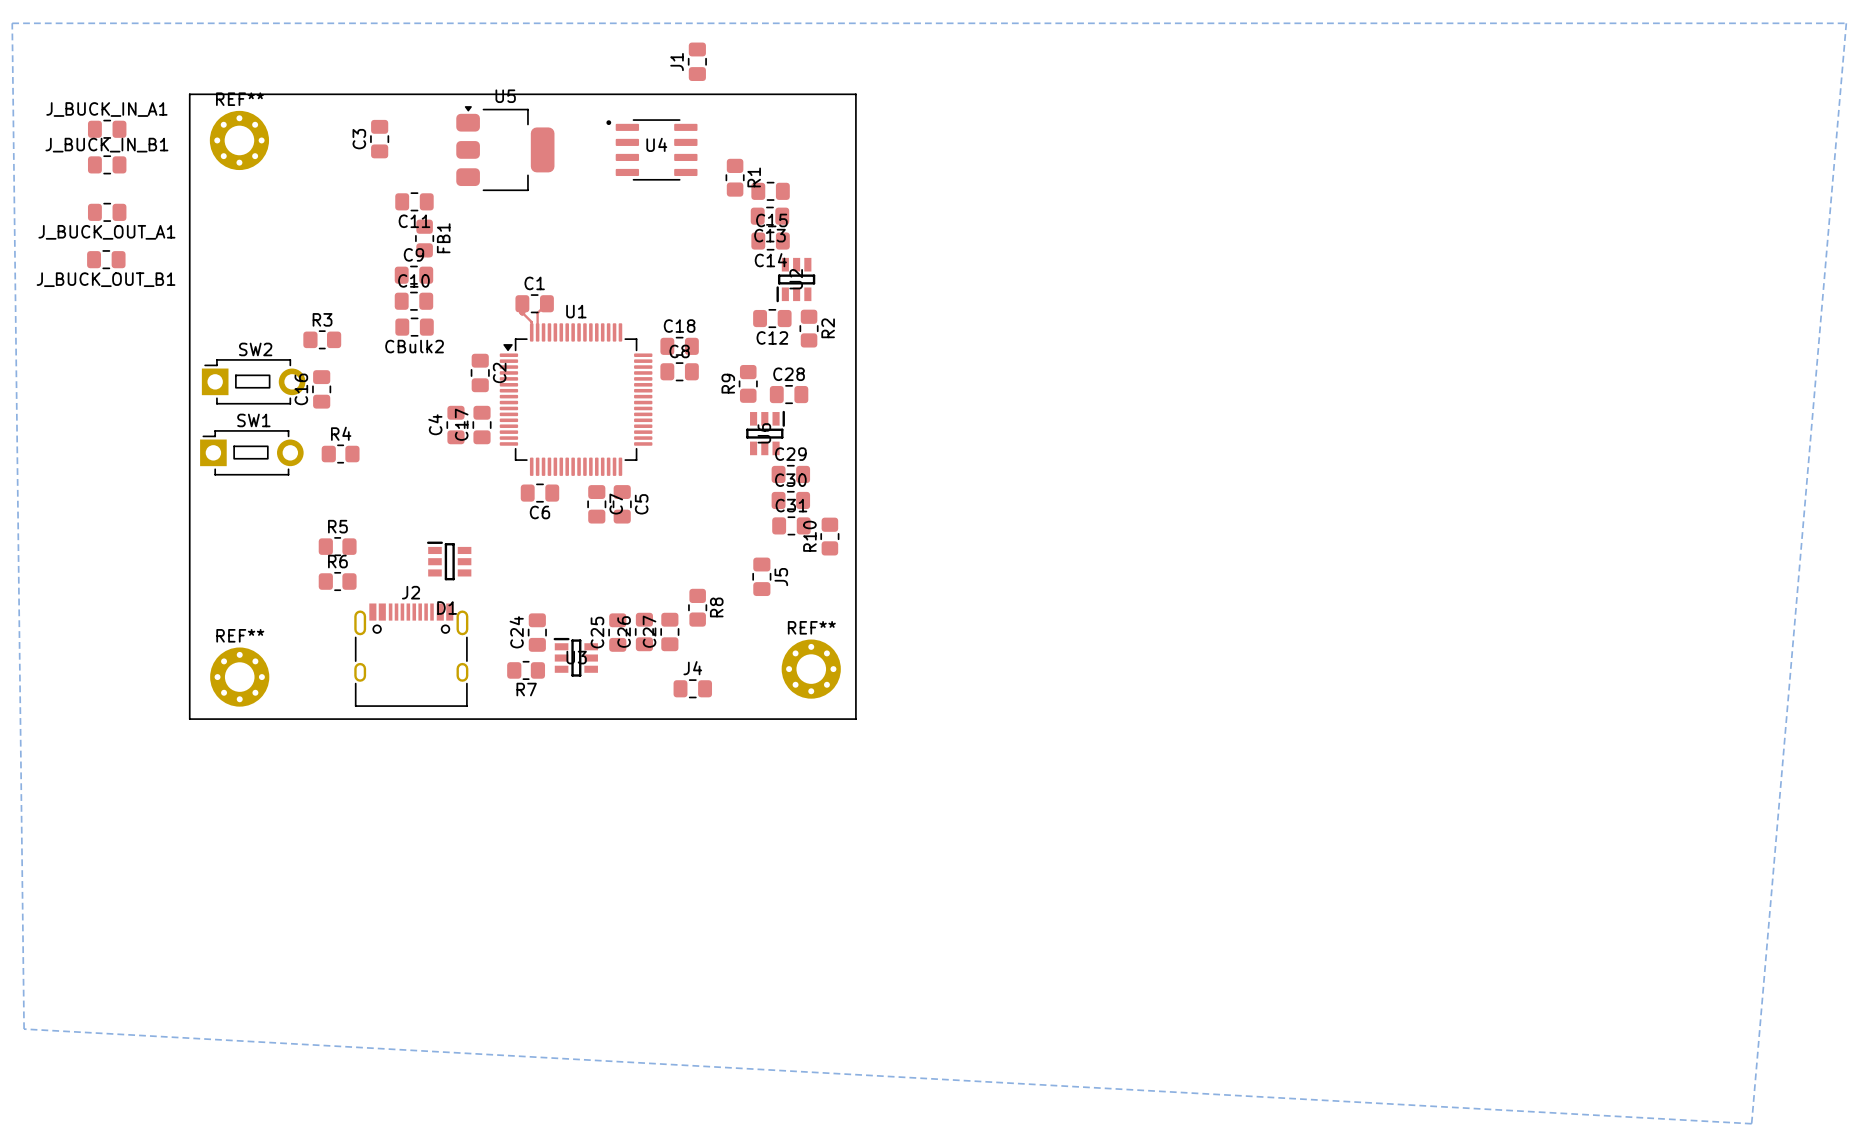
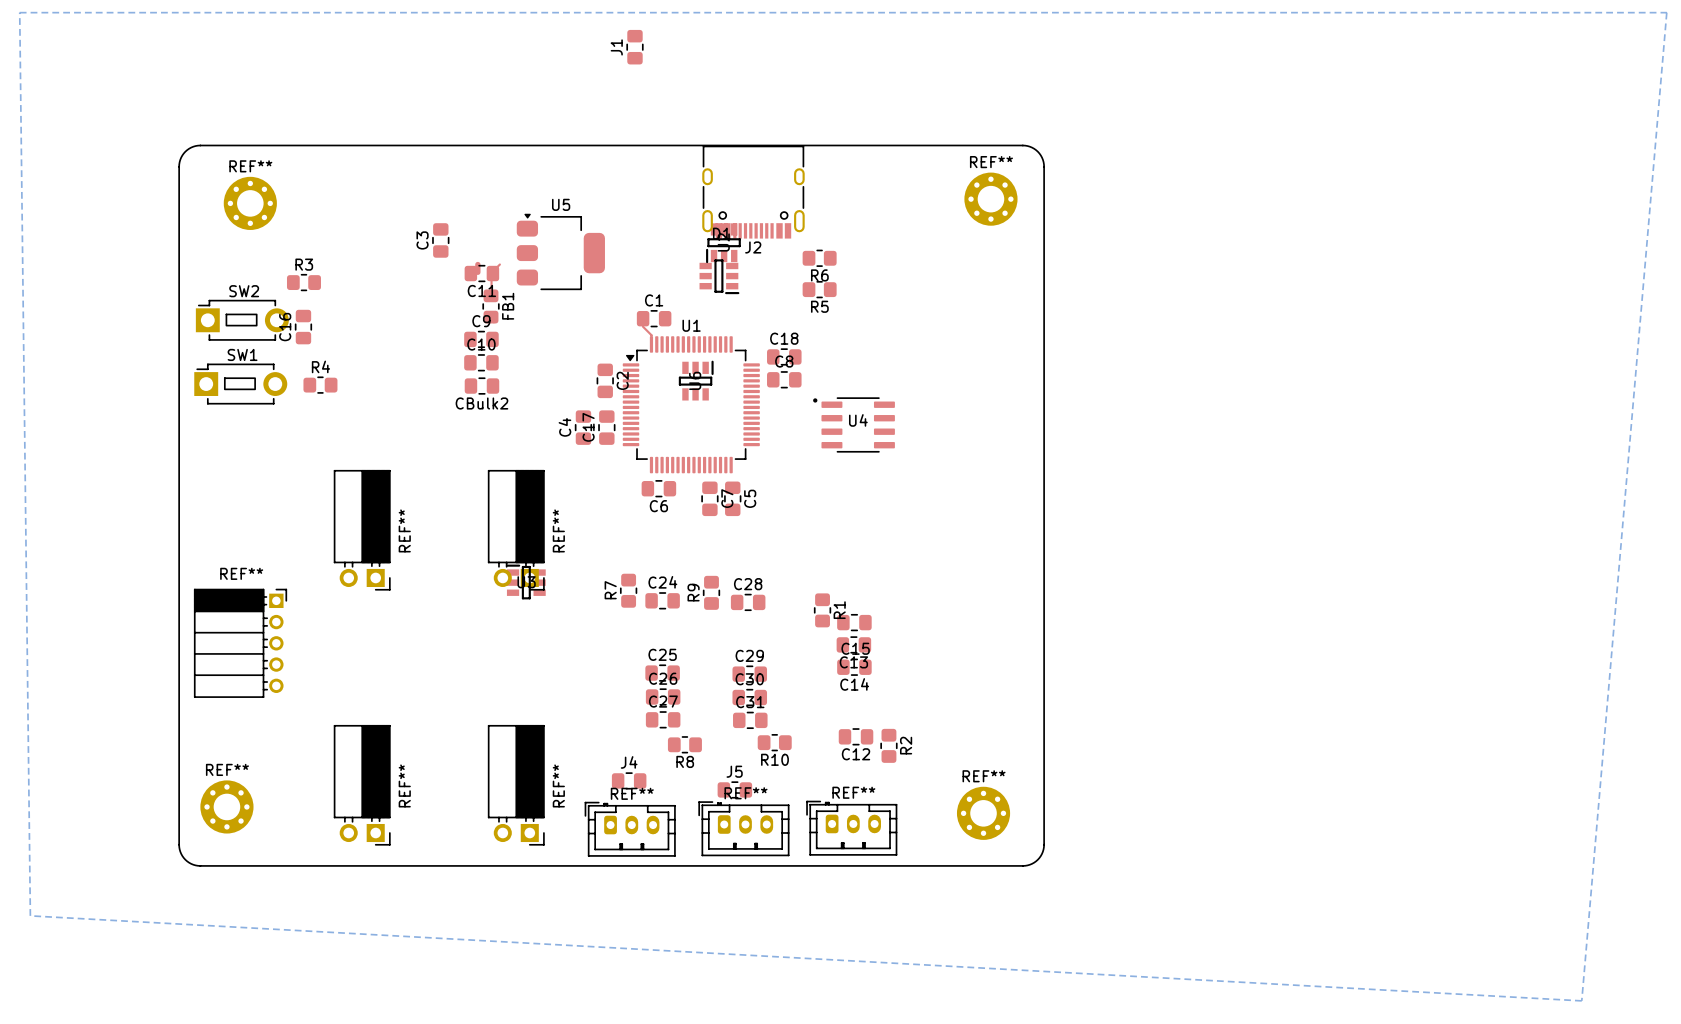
J_BUCK_IN_A1: (107, 129) -> none
C3 position: (379, 139) -> (440, 240)
REF** position: (239, 140) -> (250, 203)
U5 position: (505, 148) -> (560, 251)
U4 position: (651, 149) -> (854, 424)
J_BUCK_IN_B1: (107, 164) -> none
R1 position: (735, 177) -> (822, 610)
C15 position: (770, 191) -> (854, 622)
board edge: (189, 194) (189, 94) (855, 94) (855, 719) (189, 719) -> (179, 166) (181, 157) (185, 151) (191, 147) (200, 145) (1022, 145) (1036, 150) (1041, 157) (1044, 166) (1043, 849) (1036, 861) (1022, 865) (195, 865) (185, 859) (179, 847) (179, 637)
C11 position: (414, 201) -> (481, 273)
J_BUCK_OUT_A1: (107, 212) -> none
C13 position: (769, 216) -> (853, 644)
REF**: none -> (990, 199)
FB1 position: (424, 238) -> (491, 306)
C14 position: (770, 241) -> (854, 667)
J_BUCK_OUT_B1: (106, 259) -> none
C9 position: (413, 275) -> (481, 339)
C10 position: (413, 301) -> (481, 362)
C1 position: (534, 303) -> (654, 318)
top track: (522, 312) (531, 322) (531, 332) -> (642, 326) (651, 335) (651, 344)
C12 position: (772, 318) -> (856, 736)
CBulk2 position: (414, 327) -> (481, 386)
R2 position: (809, 328) -> (888, 745)
R3 position: (322, 339) -> (303, 282)
C18 position: (679, 346) -> (784, 356)
C8 position: (679, 371) -> (784, 379)
C2 position: (480, 372) -> (605, 380)
SW2 position: (253, 381) -> (242, 320)
R9 position: (748, 383) -> (711, 592)
C16 position: (321, 389) -> (303, 327)
C28 position: (789, 394) -> (748, 602)
U1 position: (576, 399) -> (691, 404)
C4 position: (455, 425) -> (583, 427)
C17 position: (482, 425) -> (606, 427)
SW1 position: (251, 452) -> (240, 384)
R4 position: (340, 454) -> (320, 385)
C29 position: (790, 474) -> (749, 674)
C6 position: (539, 493) -> (658, 488)
C30 position: (790, 500) -> (749, 697)
C7 position: (596, 504) -> (709, 498)
C5 position: (622, 504) -> (732, 498)
C31 position: (791, 525) -> (750, 720)
R5 name position: R5 (337, 526) -> R5 (819, 306)
R10 name position: R10 (809, 536) -> R10 (774, 759)
R10 rotation: 0° (829, 536) -> 90° clockwise (774, 742)
R10 position: (829, 536) -> (774, 742)
R5 position: (337, 546) -> (819, 289)
D1 rotation: 0° (449, 560) -> 180° (719, 276)
D1 position: (449, 560) -> (719, 276)
R6 name position: R6 (337, 561) -> R6 (819, 275)
J5 rotation: 0° (761, 576) -> 90° clockwise (734, 789)
J5 position: (761, 576) -> (734, 789)
J5 name position: J5 (781, 577) -> J5 (734, 771)
R6 position: (337, 581) -> (819, 258)
REF**: none -> (362, 530)
REF**: none -> (516, 530)
R8 rotation: 0° (697, 607) -> 90° clockwise (684, 744)
R8 position: (697, 607) -> (684, 744)
C26 rotation: 0° (644, 631) -> 90° clockwise (663, 696)
C26 position: (644, 631) -> (663, 696)
C27 rotation: 0° (669, 631) -> 90° clockwise (663, 719)
C27 position: (669, 631) -> (663, 719)
C24 rotation: 0° (537, 632) -> 90° clockwise (662, 600)
C24 position: (537, 632) -> (662, 600)
C25 rotation: 0° (617, 632) -> 90° clockwise (662, 673)
C25 position: (617, 632) -> (662, 673)
J2 rotation: 0° (411, 655) -> 180° (753, 192)
J2 position: (411, 655) -> (753, 192)
REF**: (811, 669) -> none
R7 rotation: 0° (526, 670) -> 90° clockwise (628, 590)
R7 position: (526, 670) -> (628, 590)
REF**: (239, 677) -> none
J4 position: (692, 688) -> (629, 780)
REF**: none -> (240, 643)
REF**: none -> (362, 785)
REF**: none -> (516, 785)
REF**: none -> (226, 806)
REF**: none -> (983, 813)
REF**: none -> (851, 828)
REF**: none -> (630, 829)
REF**: none -> (743, 828)

